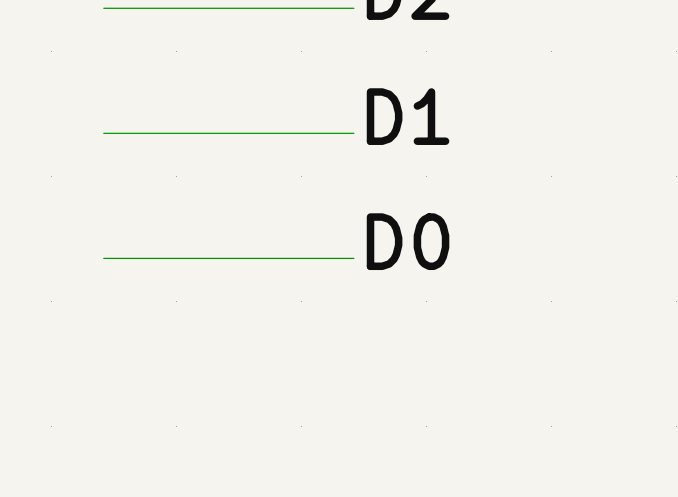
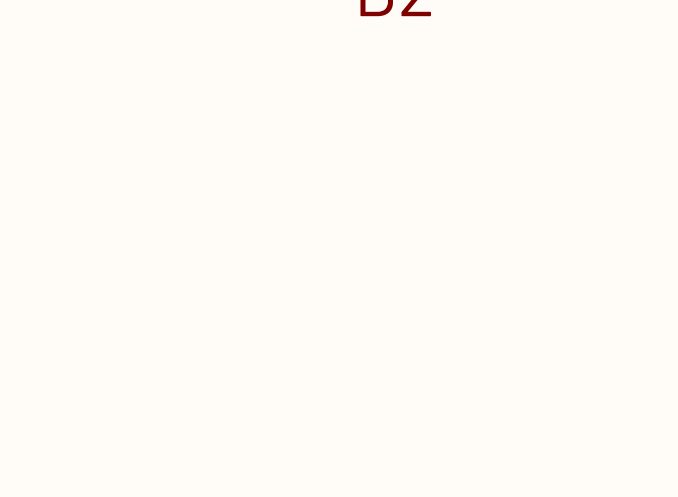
wire: (103, 8) (353, 8) -> none
label: D1 (408, 116) -> none
wire: (103, 133) (353, 133) -> none
label: D0 (408, 241) -> none
wire: (103, 258) (353, 258) -> none

